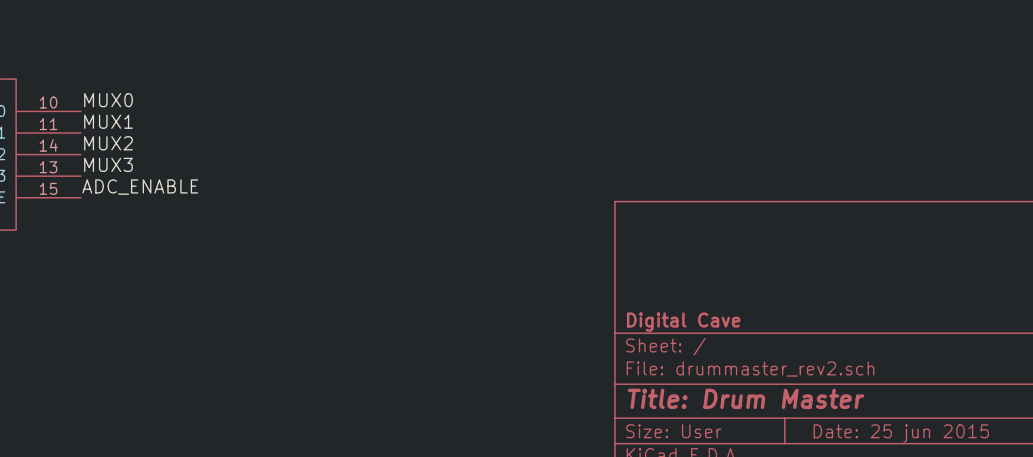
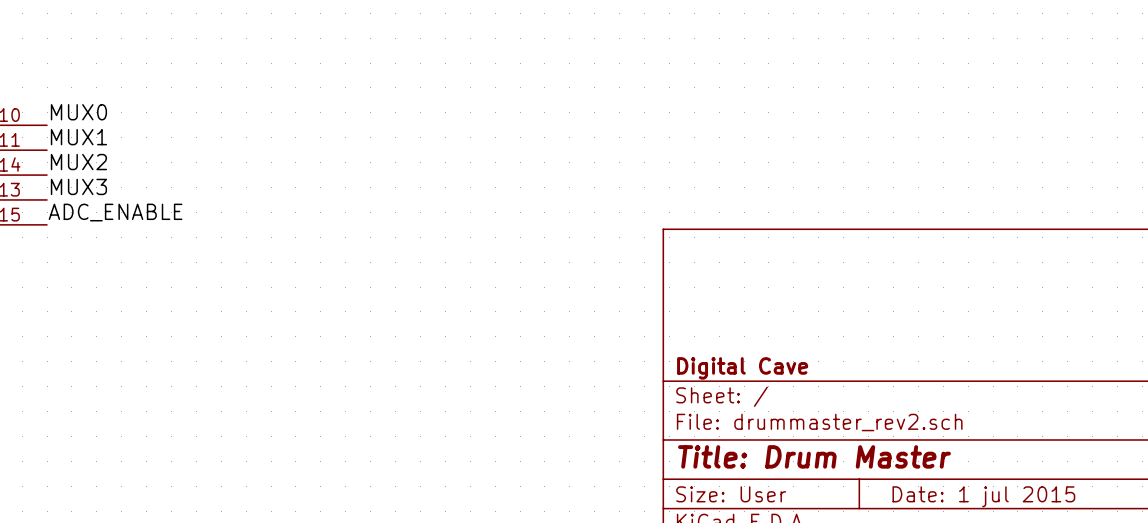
title block: Date: 25 jun 2015 (901, 433) -> Date: 1 jul 2015 (983, 496)

